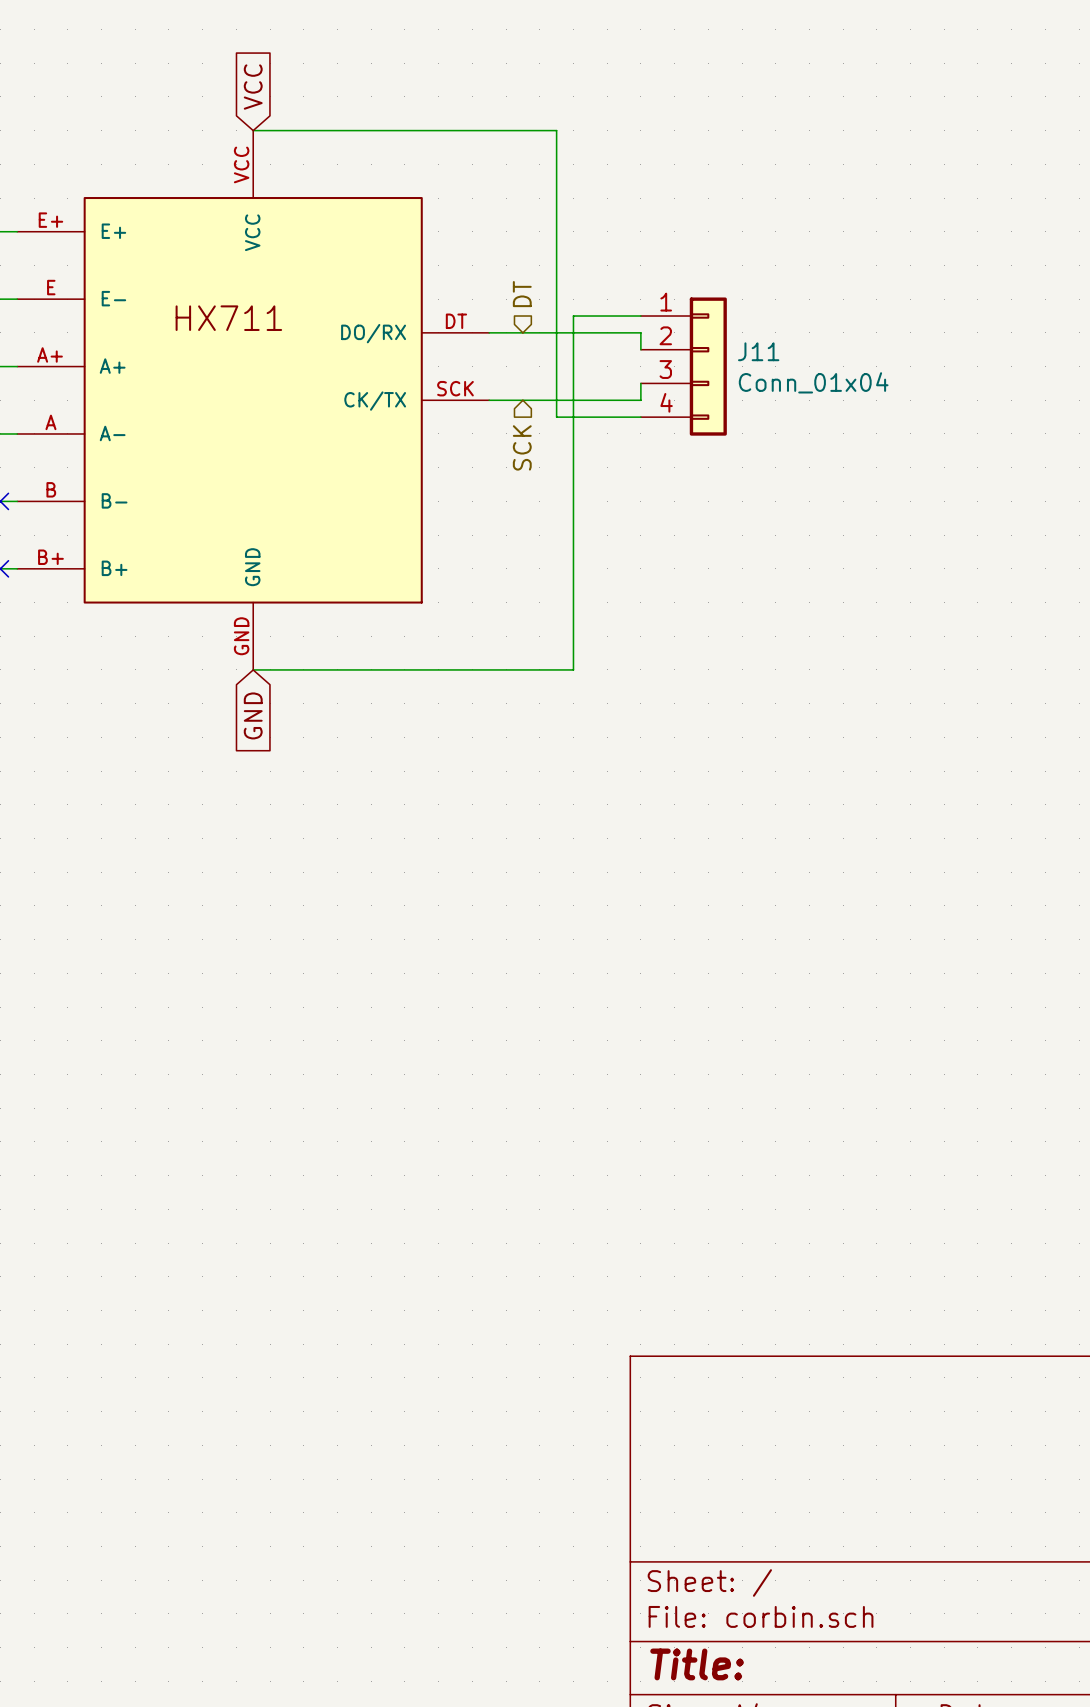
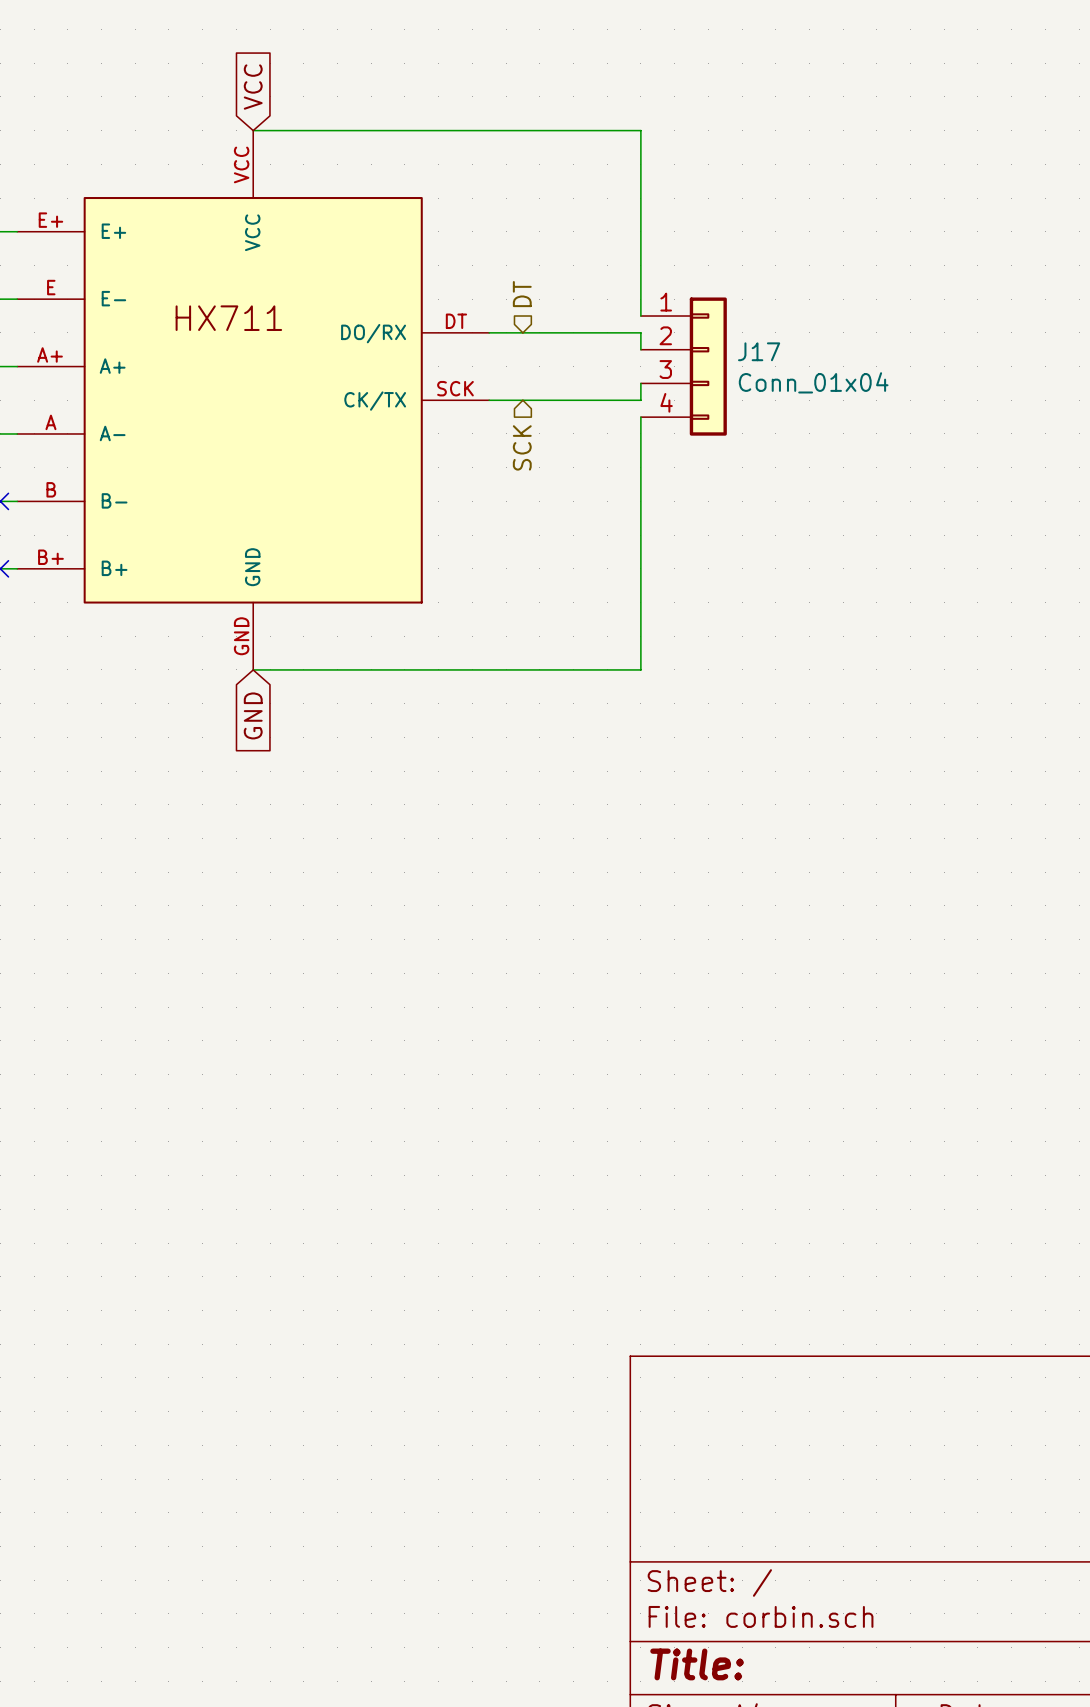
wire: (556, 130) (556, 417) (640, 417) -> (556, 130) (640, 130) (640, 316)
wire: (640, 316) (573, 316) (573, 669) -> (640, 417) (640, 669) (573, 669)
J11 name: J11 (758, 351) -> J17 (759, 351)

